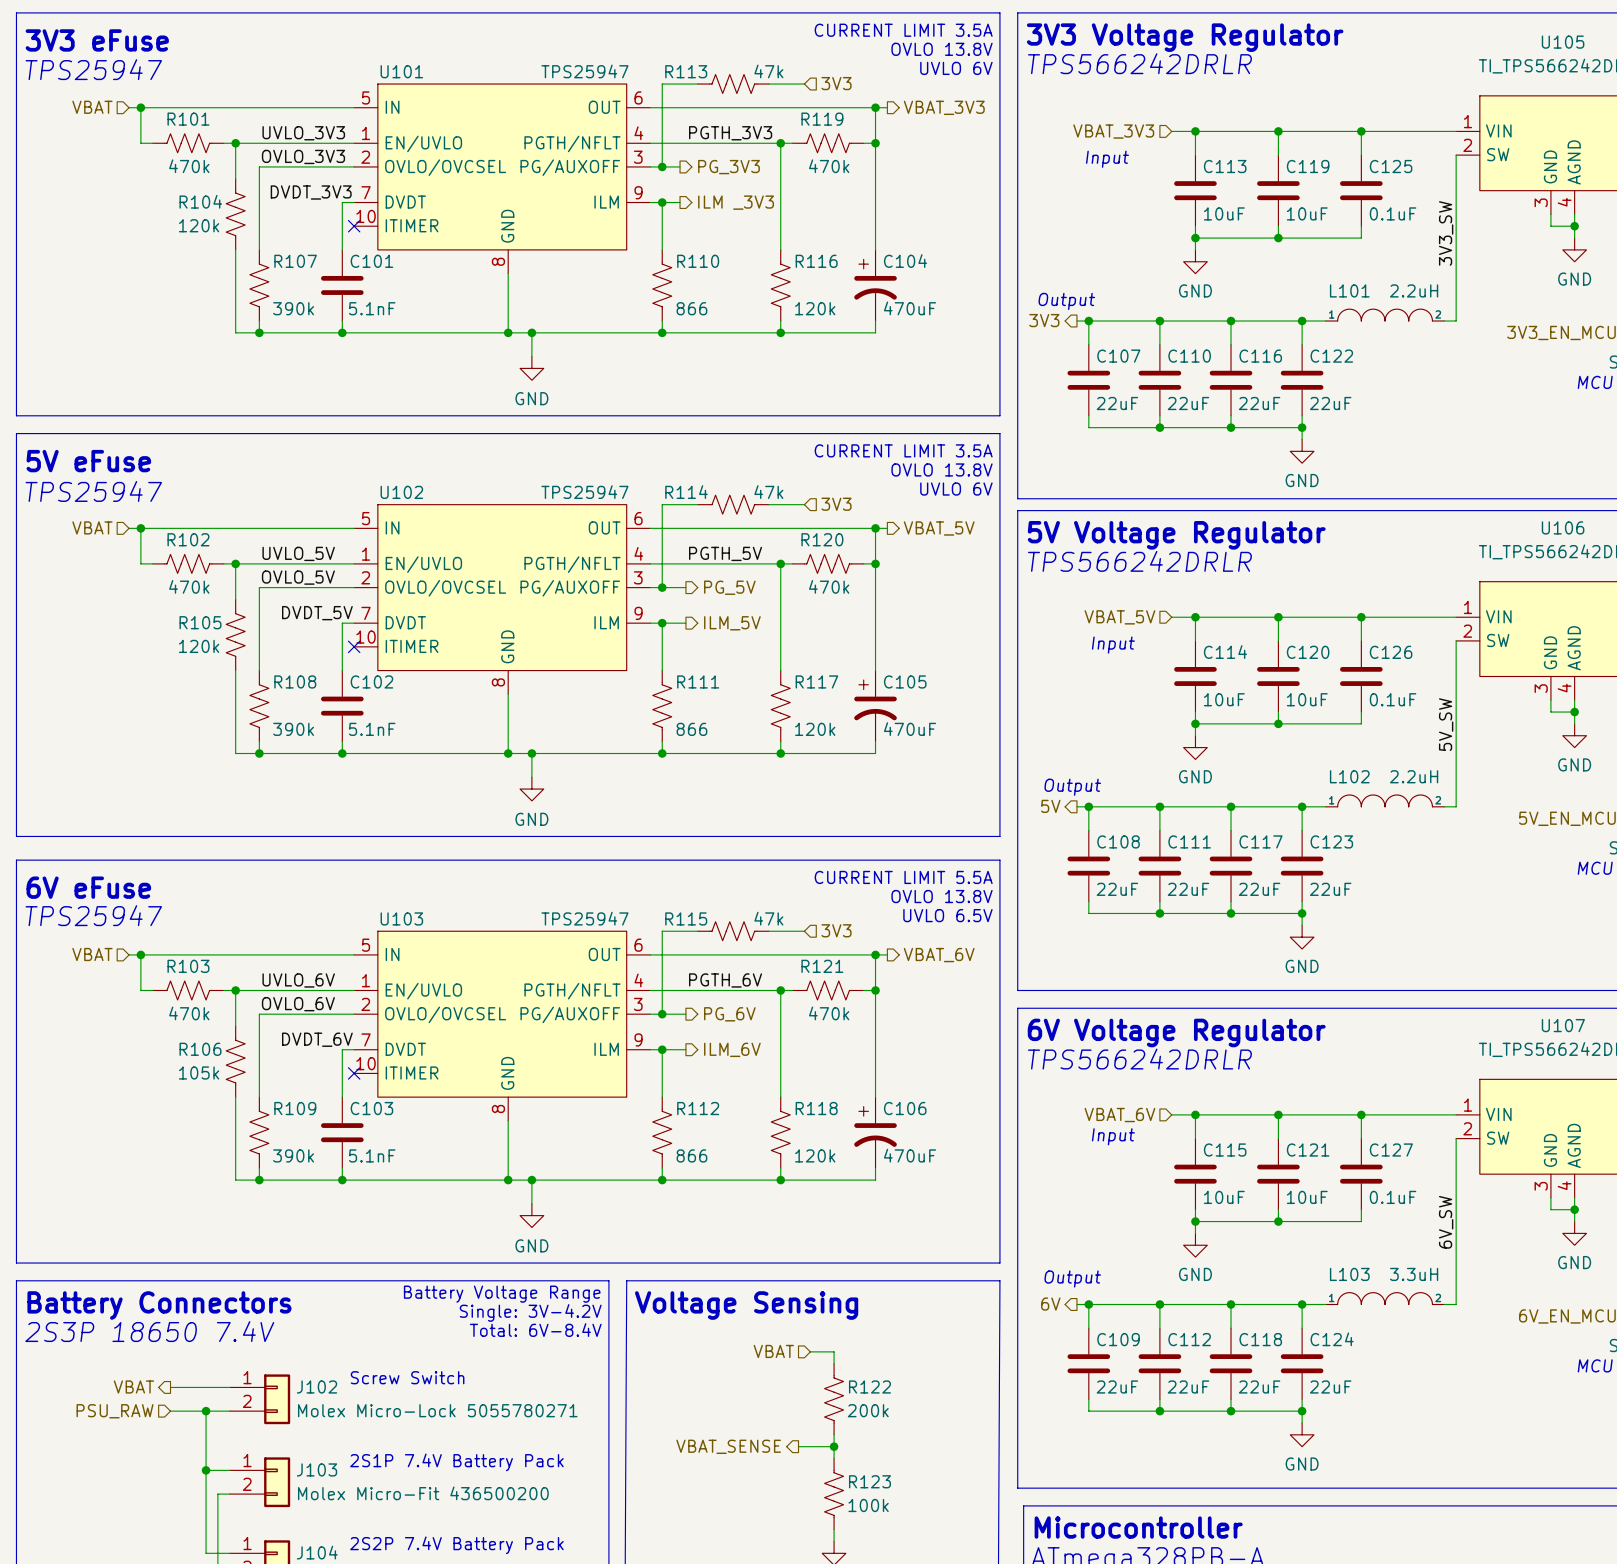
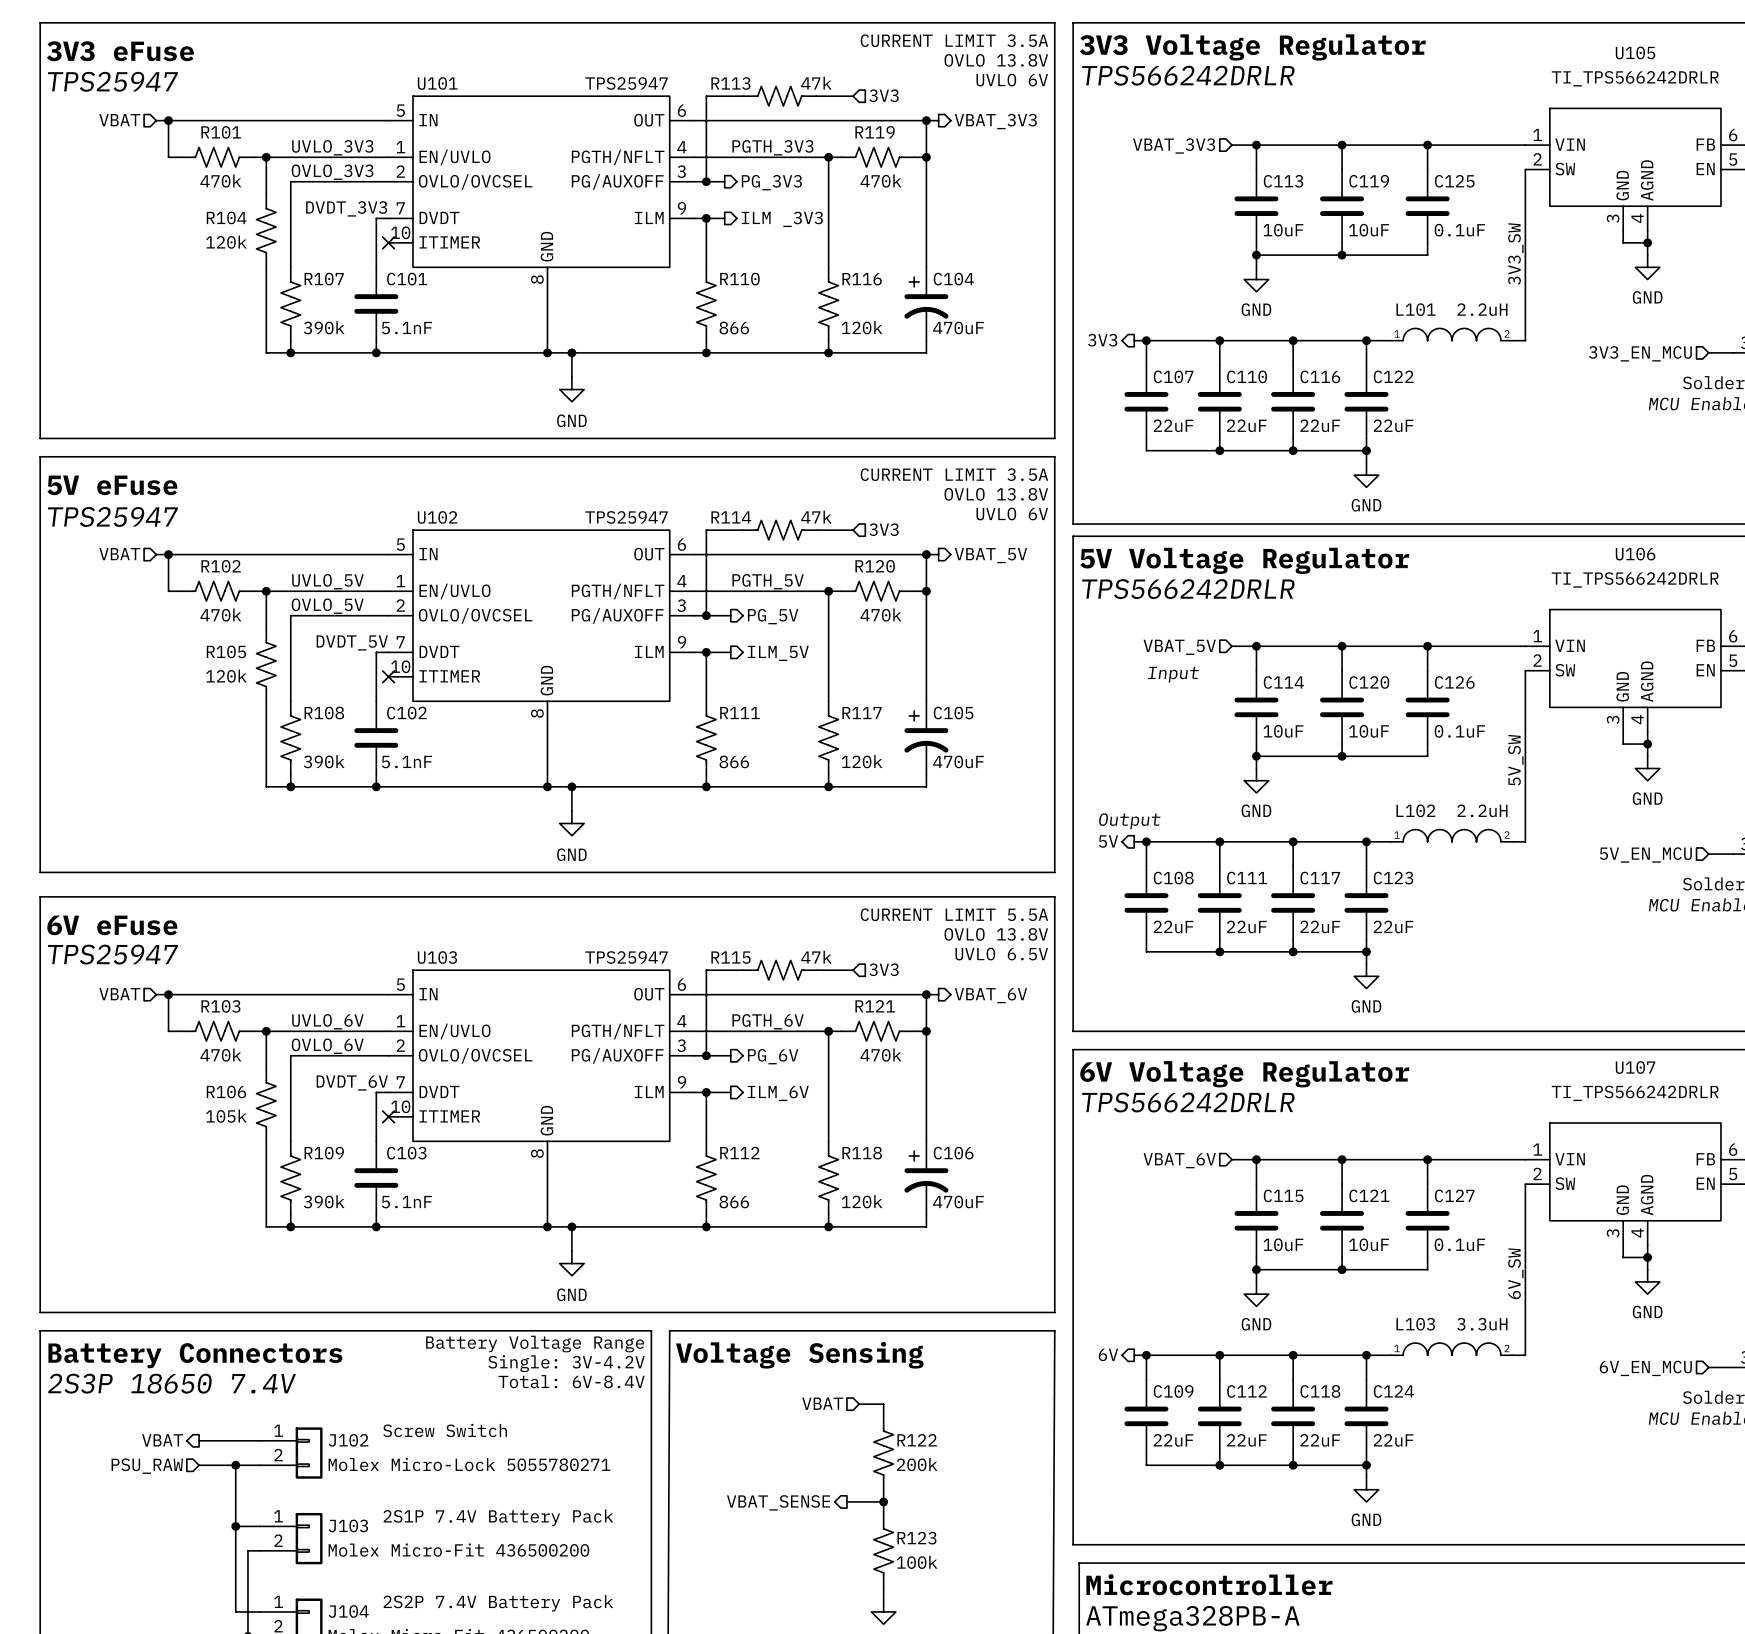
text: Input (1107, 159) -> none
text: Output (1066, 301) -> none
text: Input (1113, 1136) -> none
text: Output (1072, 1278) -> none

